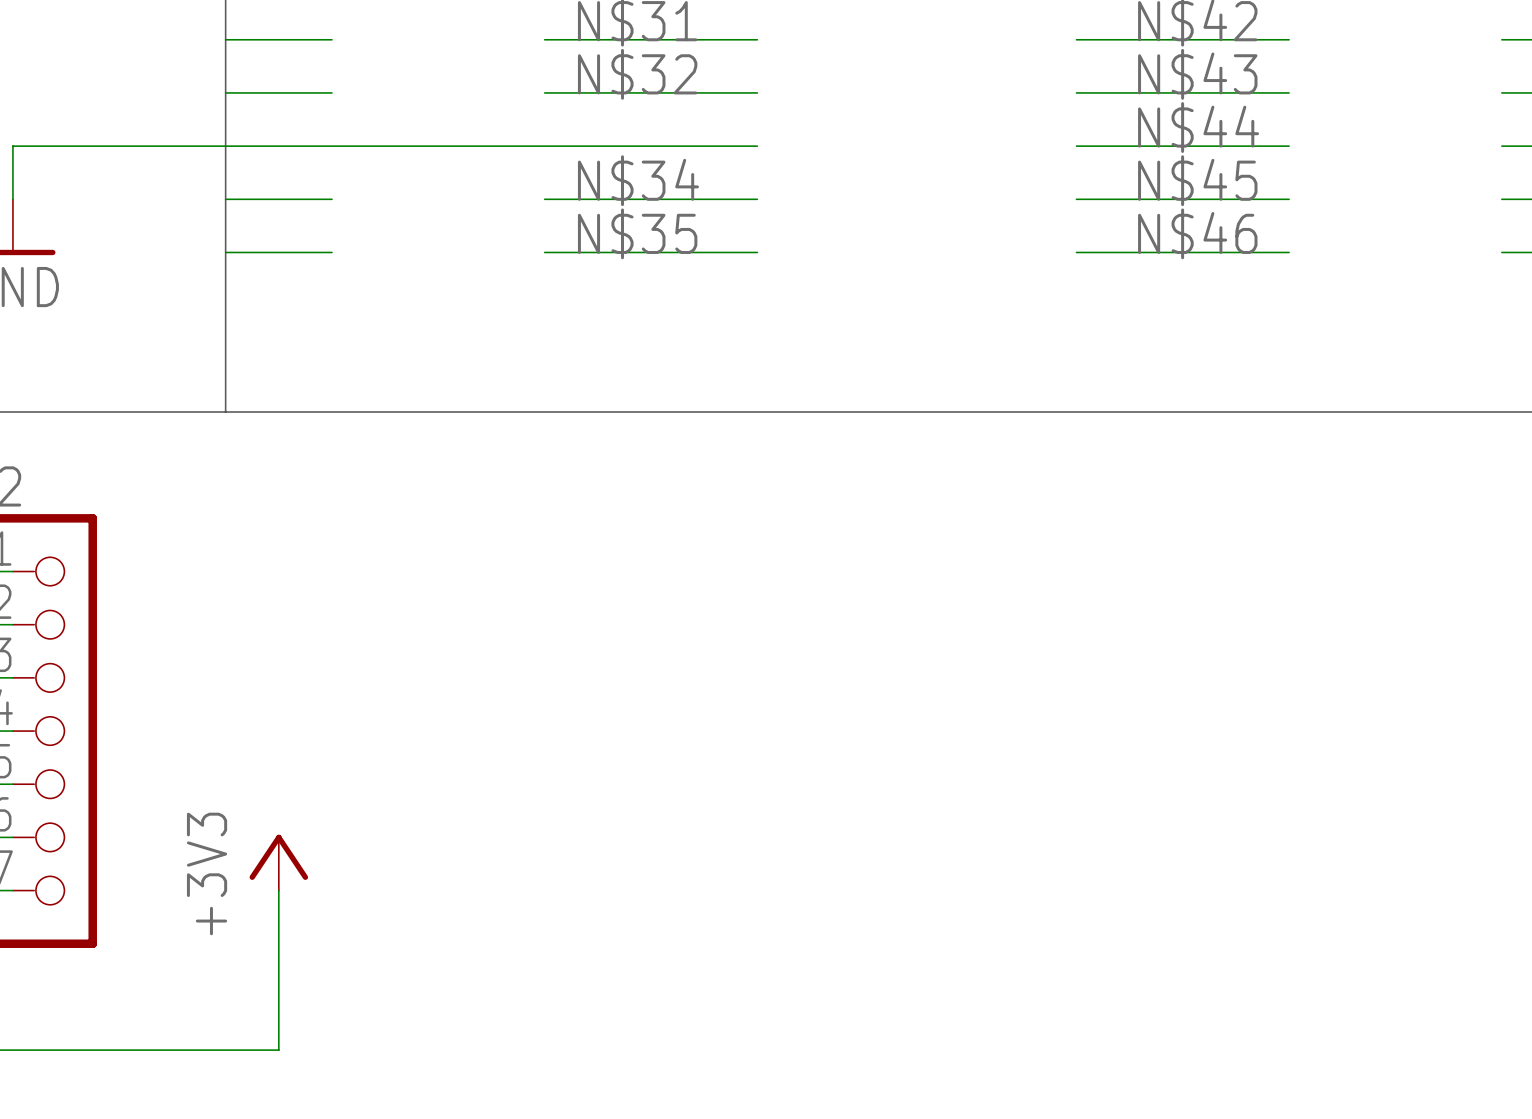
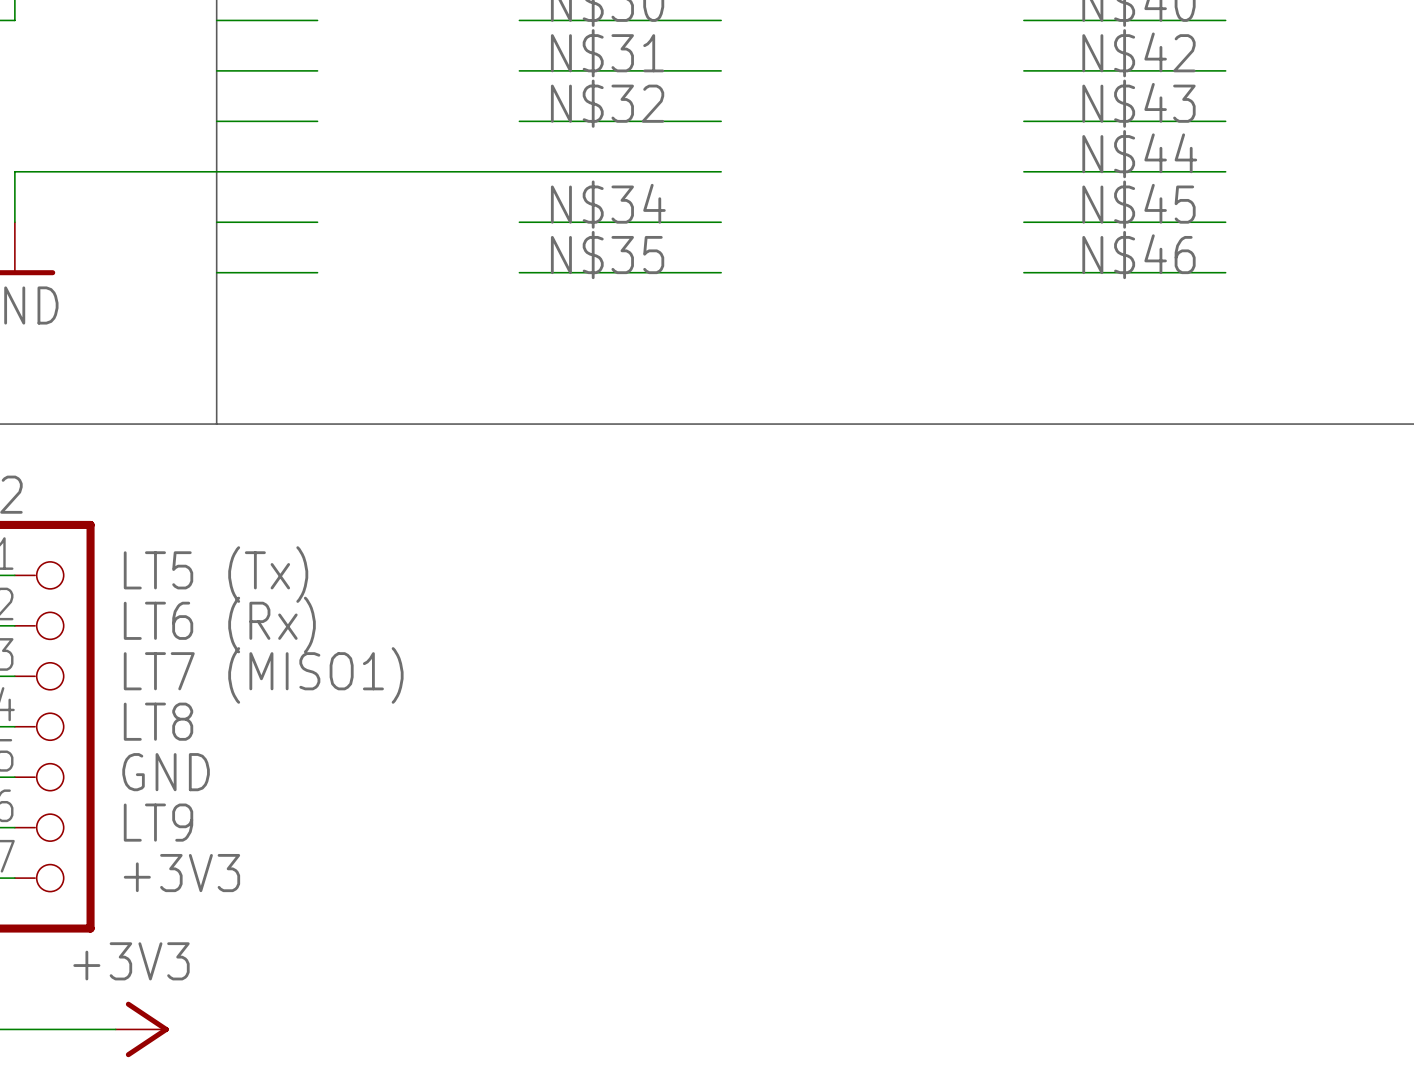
text: none -> LT5 (Tx) (216, 574)
text: none -> LT6 (Rx) (219, 625)
text: none -> LT7 (MISO1) (263, 675)
text: none -> LT8 (158, 721)
text: none -> GND (166, 772)
text: none -> LT9 (158, 822)
power symbol rotation: 0° (278, 857) -> 90° clockwise (147, 1029)
power symbol position: +3V3 (278, 862) -> +3V3 (142, 1029)
text: none -> +3V3 (181, 873)
wire: (278, 890) (278, 1050) (119, 1050) -> none

